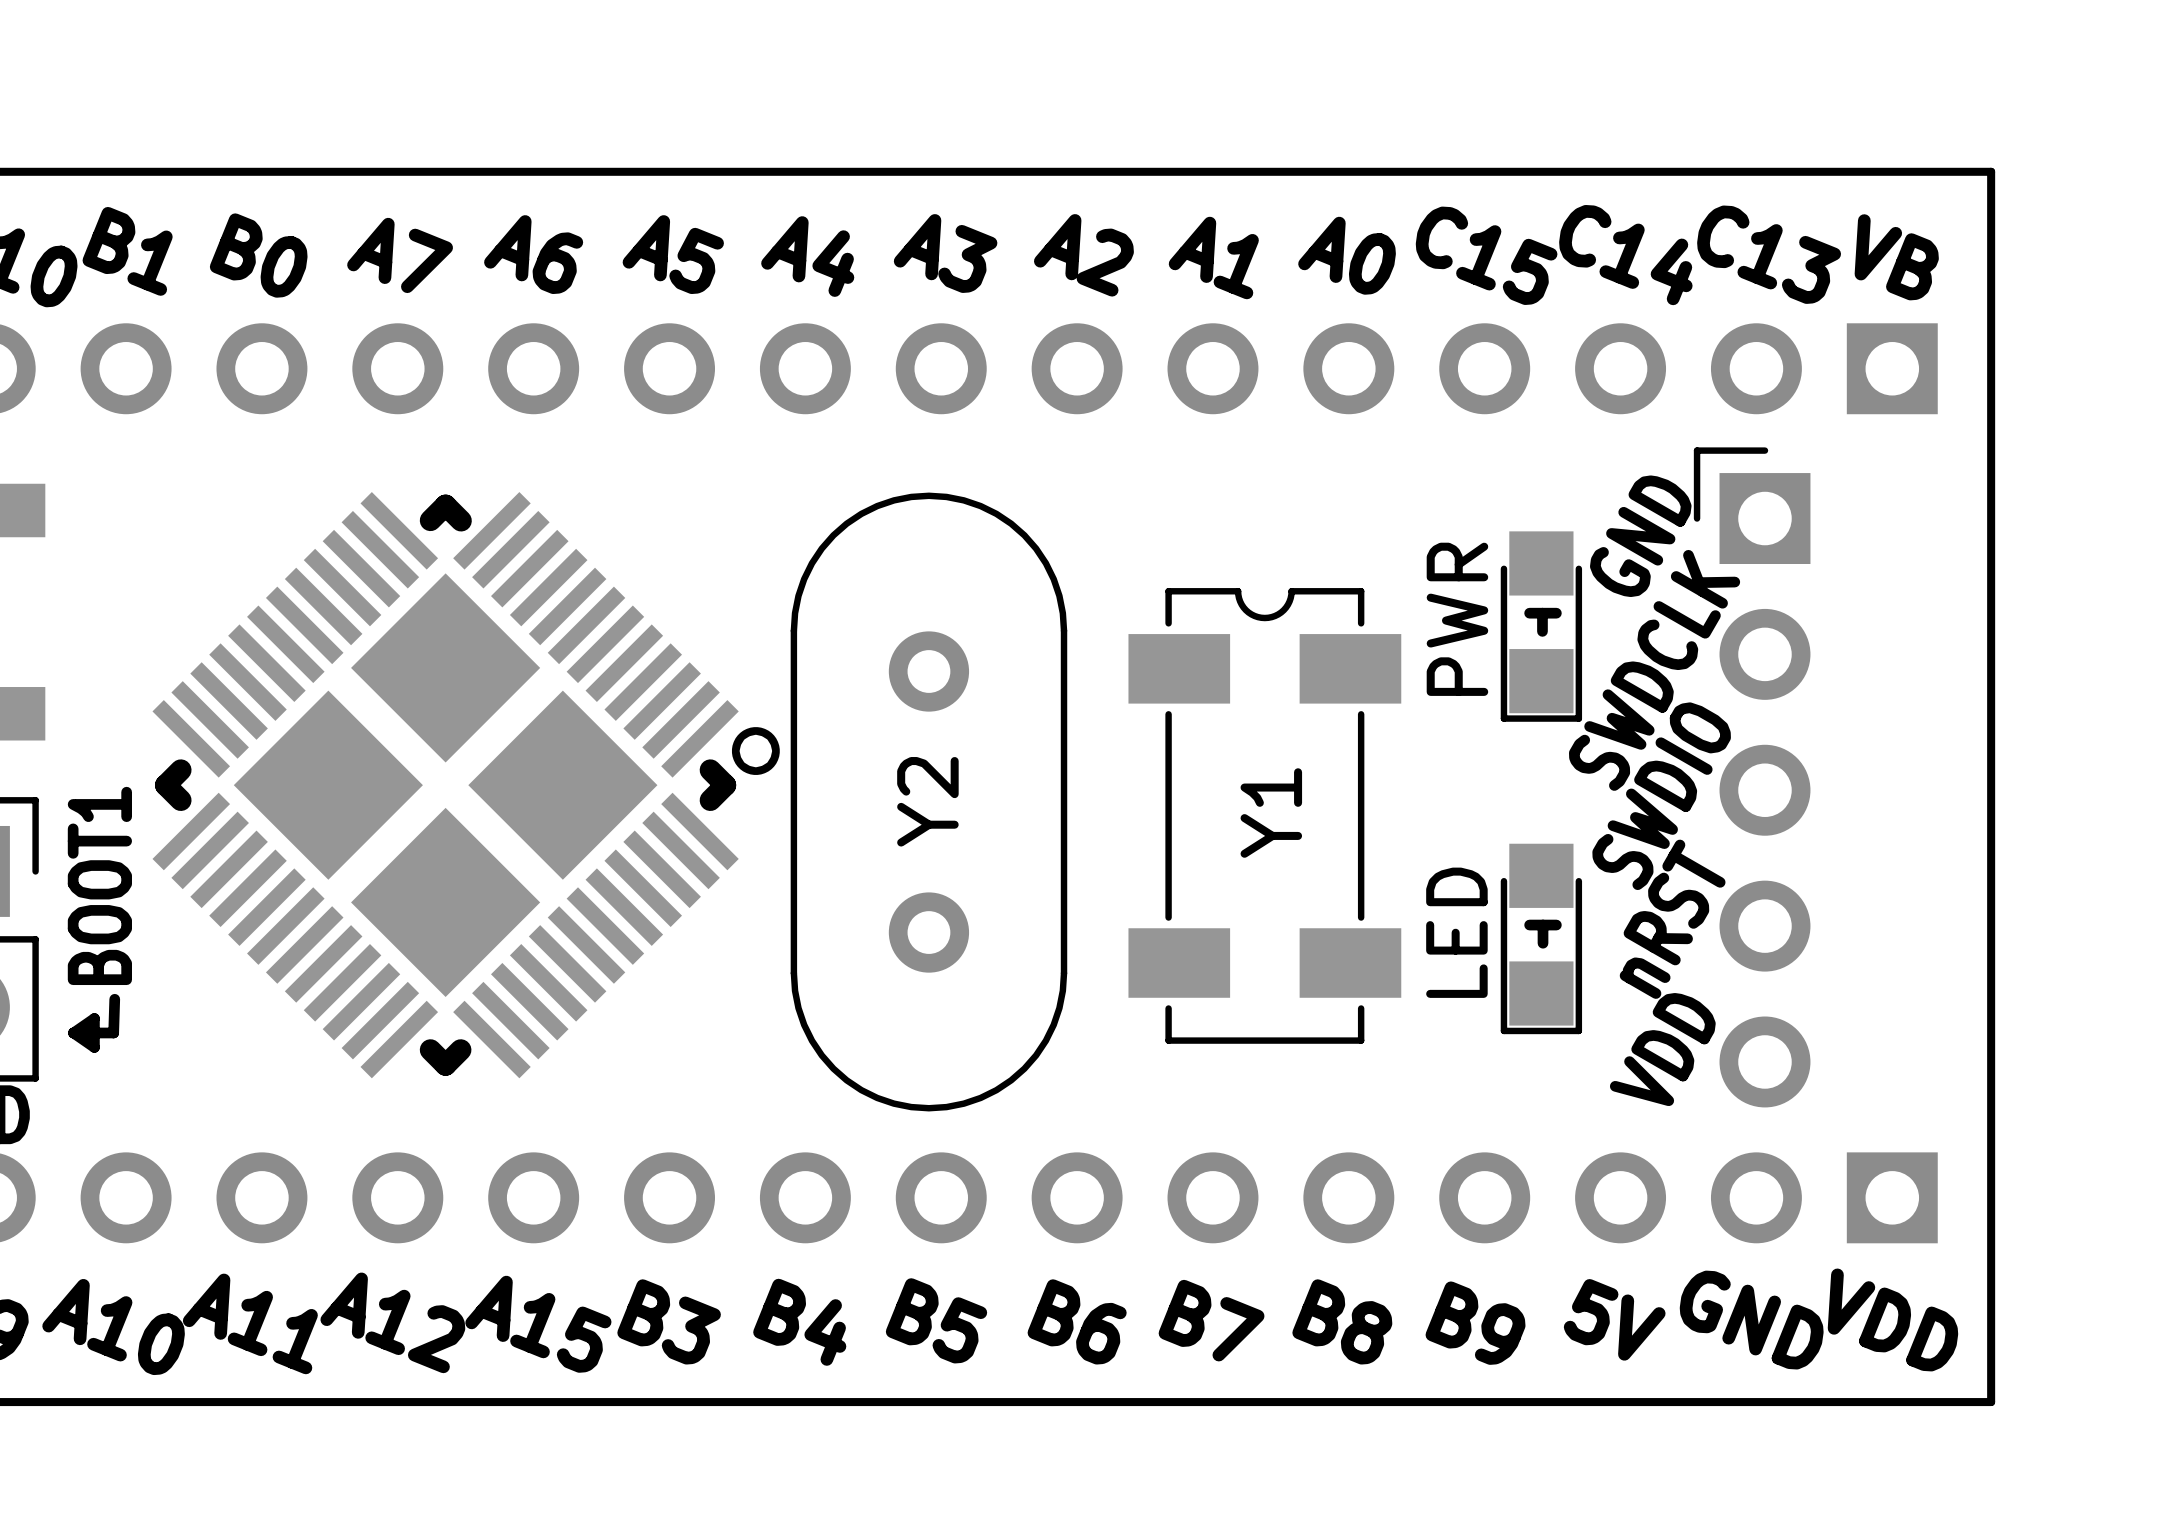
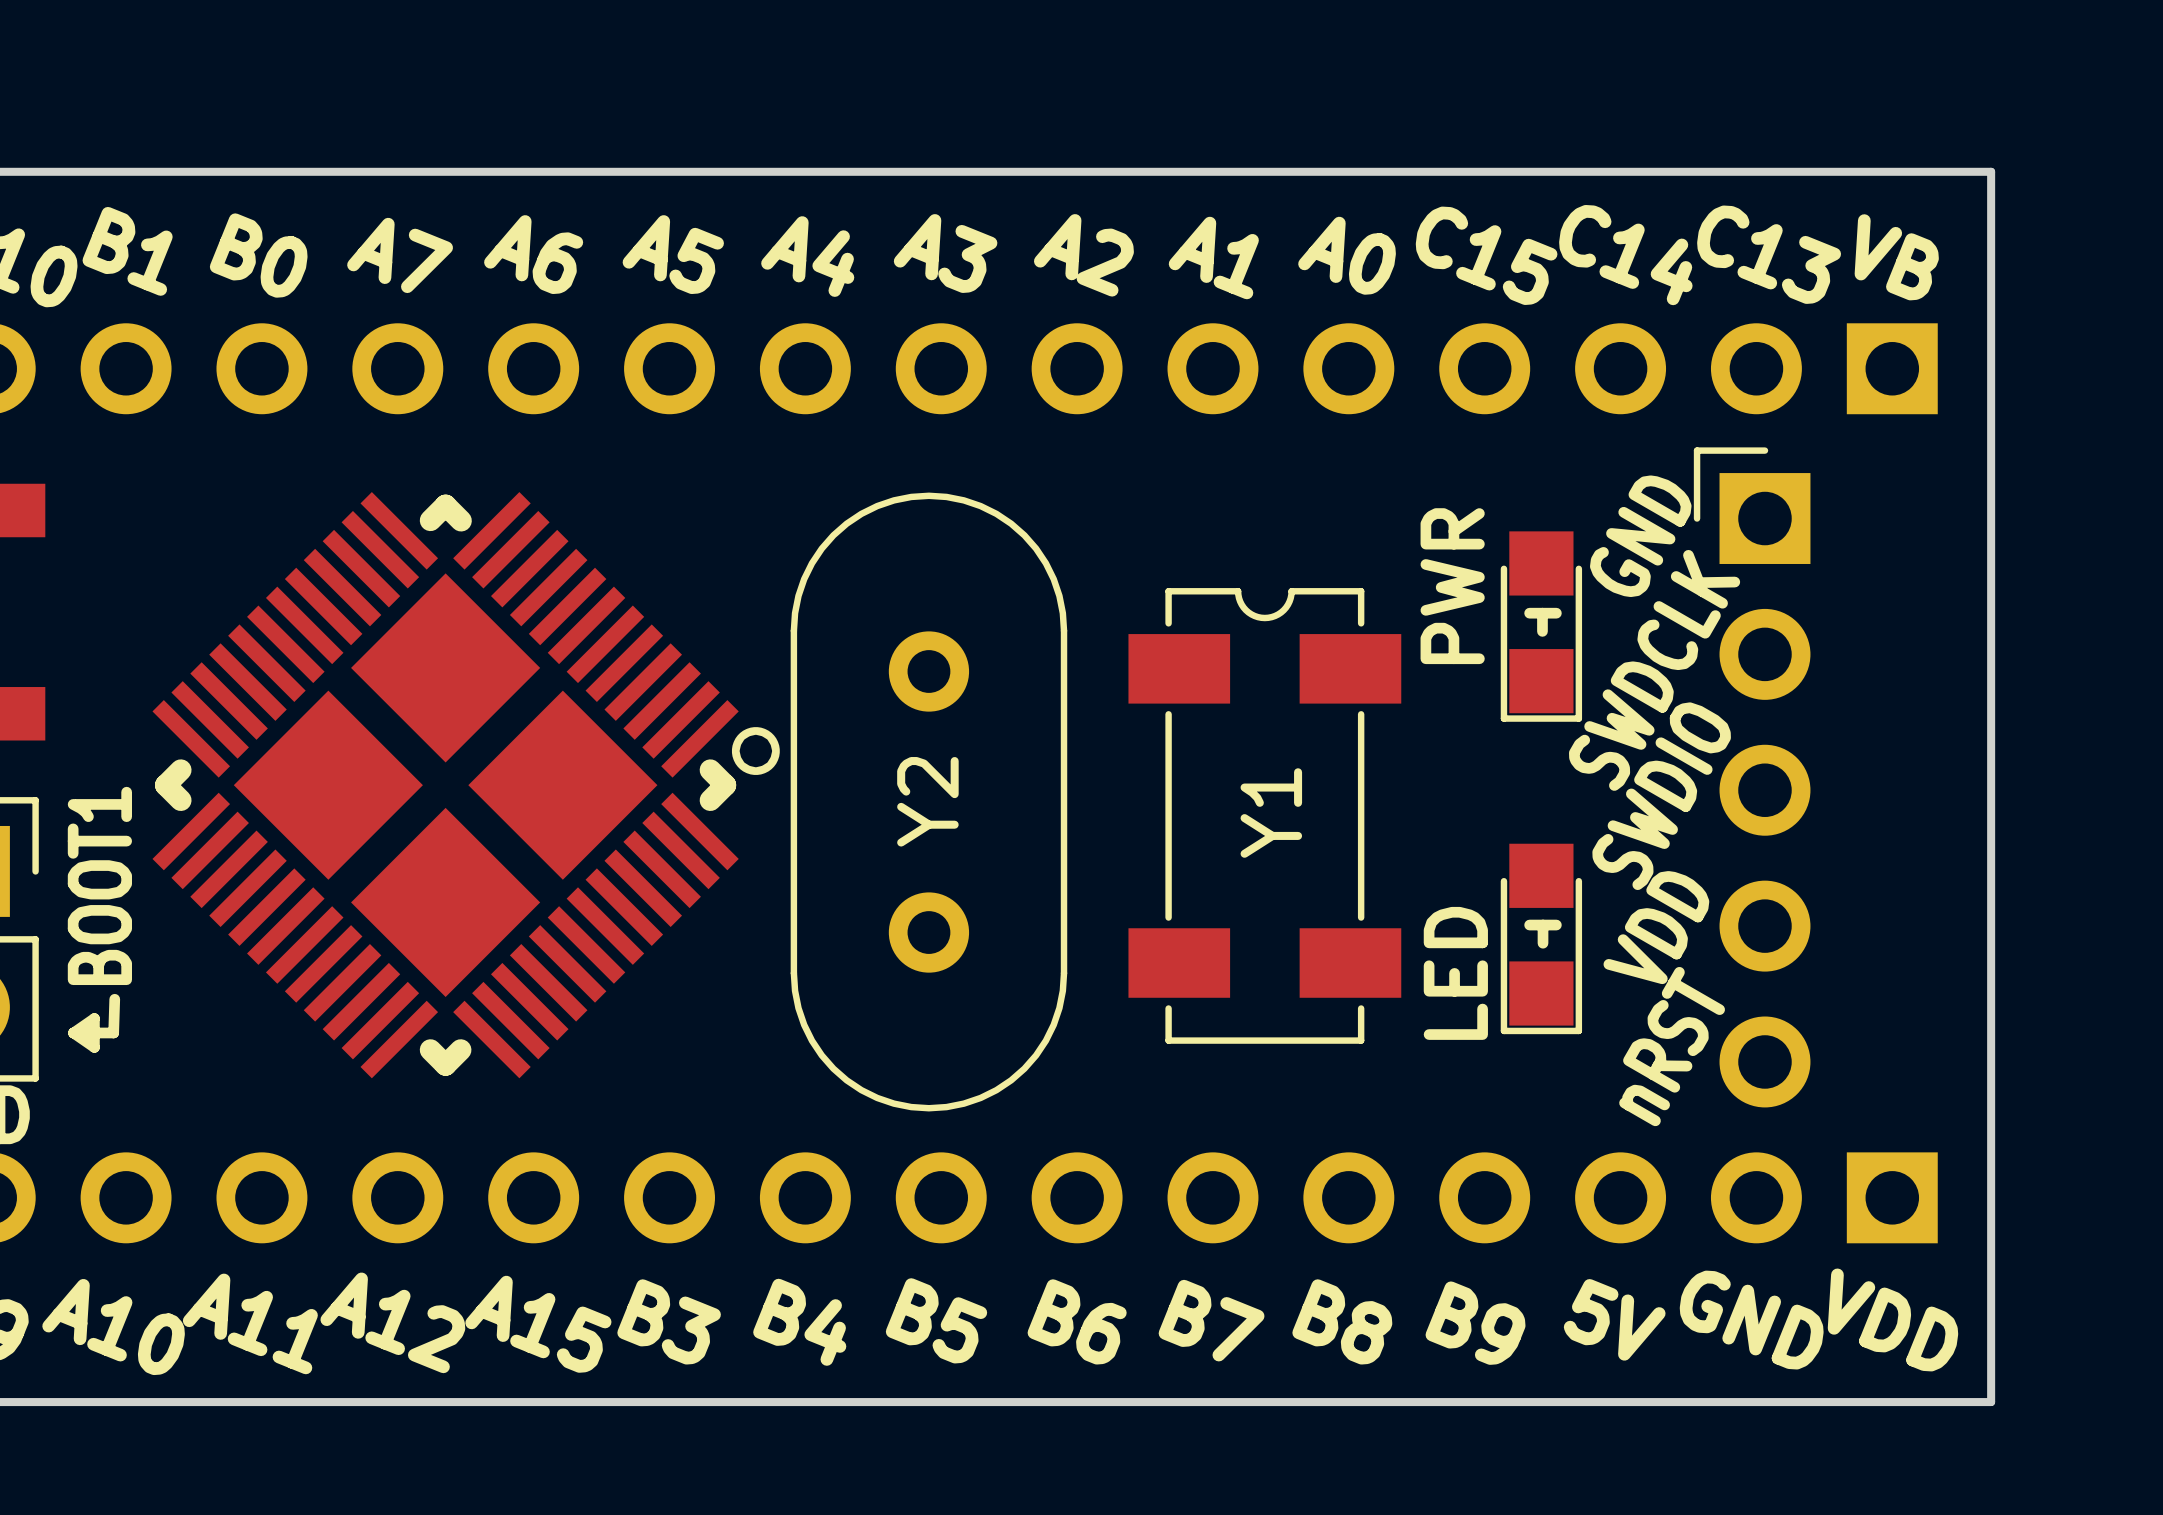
PWR name position: PWR (1457, 619) -> PWR (1452, 586)
text: nRST (1672, 919) -> VDD (1656, 927)
LED name position: LED (1456, 932) -> LED (1455, 973)
text: VDD (1662, 1049) -> nRST (1672, 1046)

